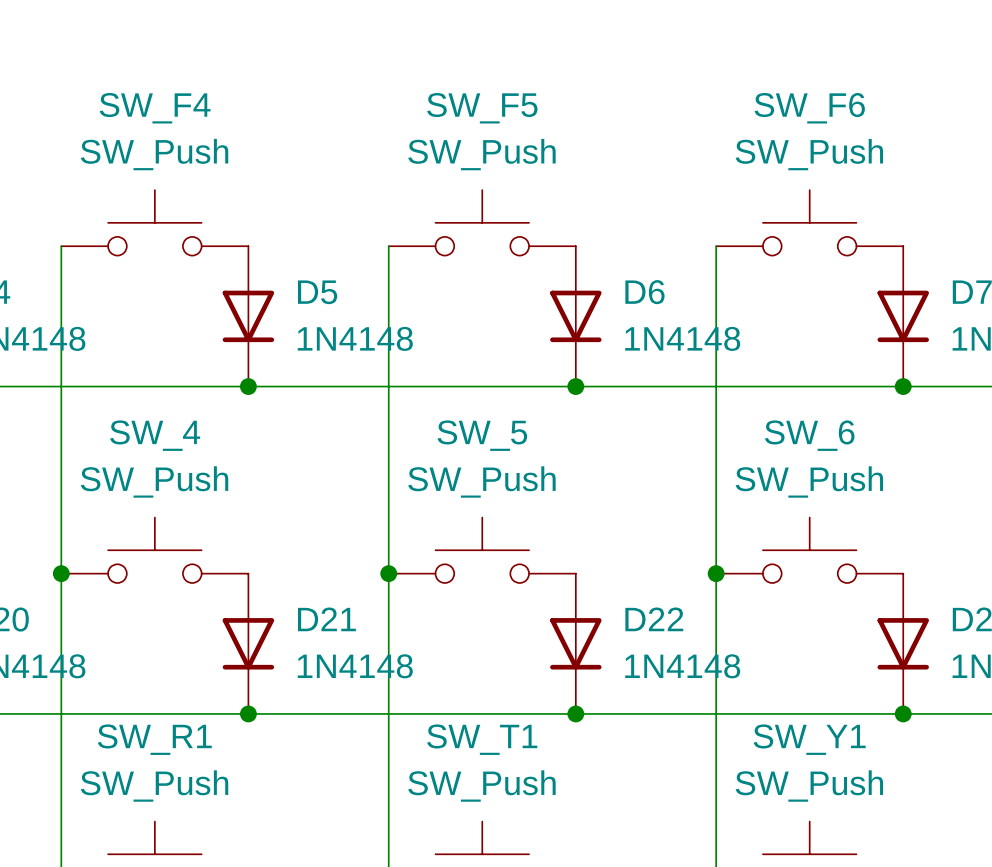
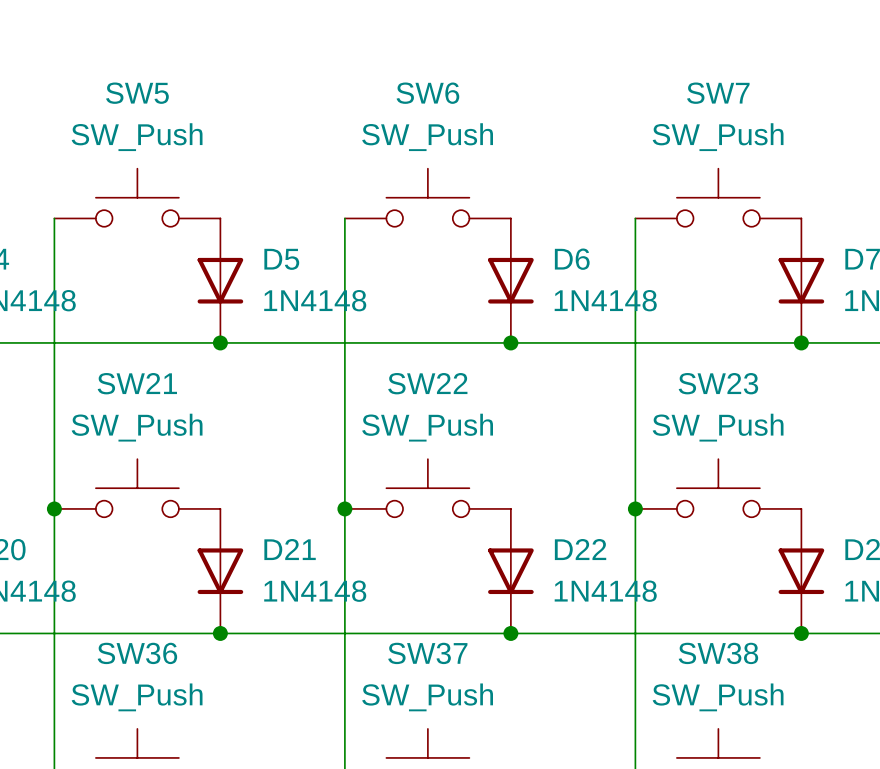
SW_F4 name: SW_F4 (155, 108) -> SW5 (137, 93)
SW_F5 name: SW_F5 (482, 108) -> SW6 (427, 93)
SW_F6 name: SW_F6 (809, 108) -> SW7 (718, 93)
SW_4 name: SW_4 (155, 435) -> SW21 (137, 383)
SW_5 name: SW_5 (482, 435) -> SW22 (427, 383)
SW_6 name: SW_6 (809, 435) -> SW23 (718, 383)
SW_R1 name: SW_R1 (154, 739) -> SW36 (137, 653)
SW_T1 name: SW_T1 (482, 739) -> SW37 (427, 653)
SW_Y1 name: SW_Y1 (809, 739) -> SW38 (718, 653)

